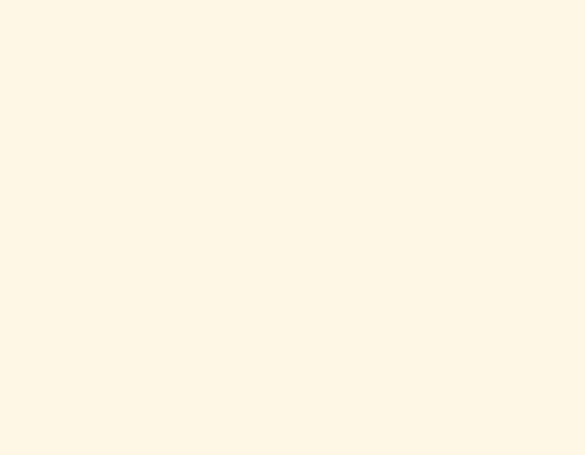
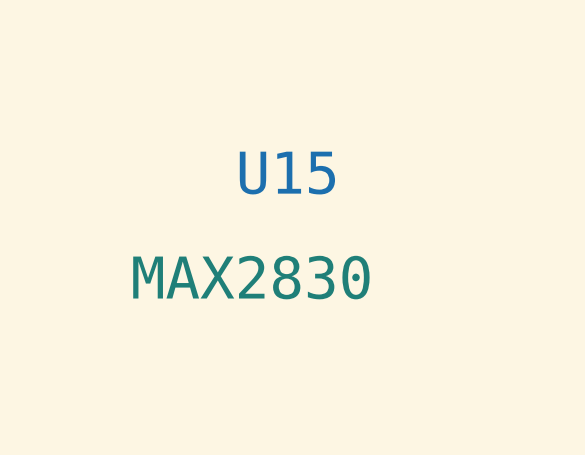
U15: none -> MAX2830 (251, 225)

